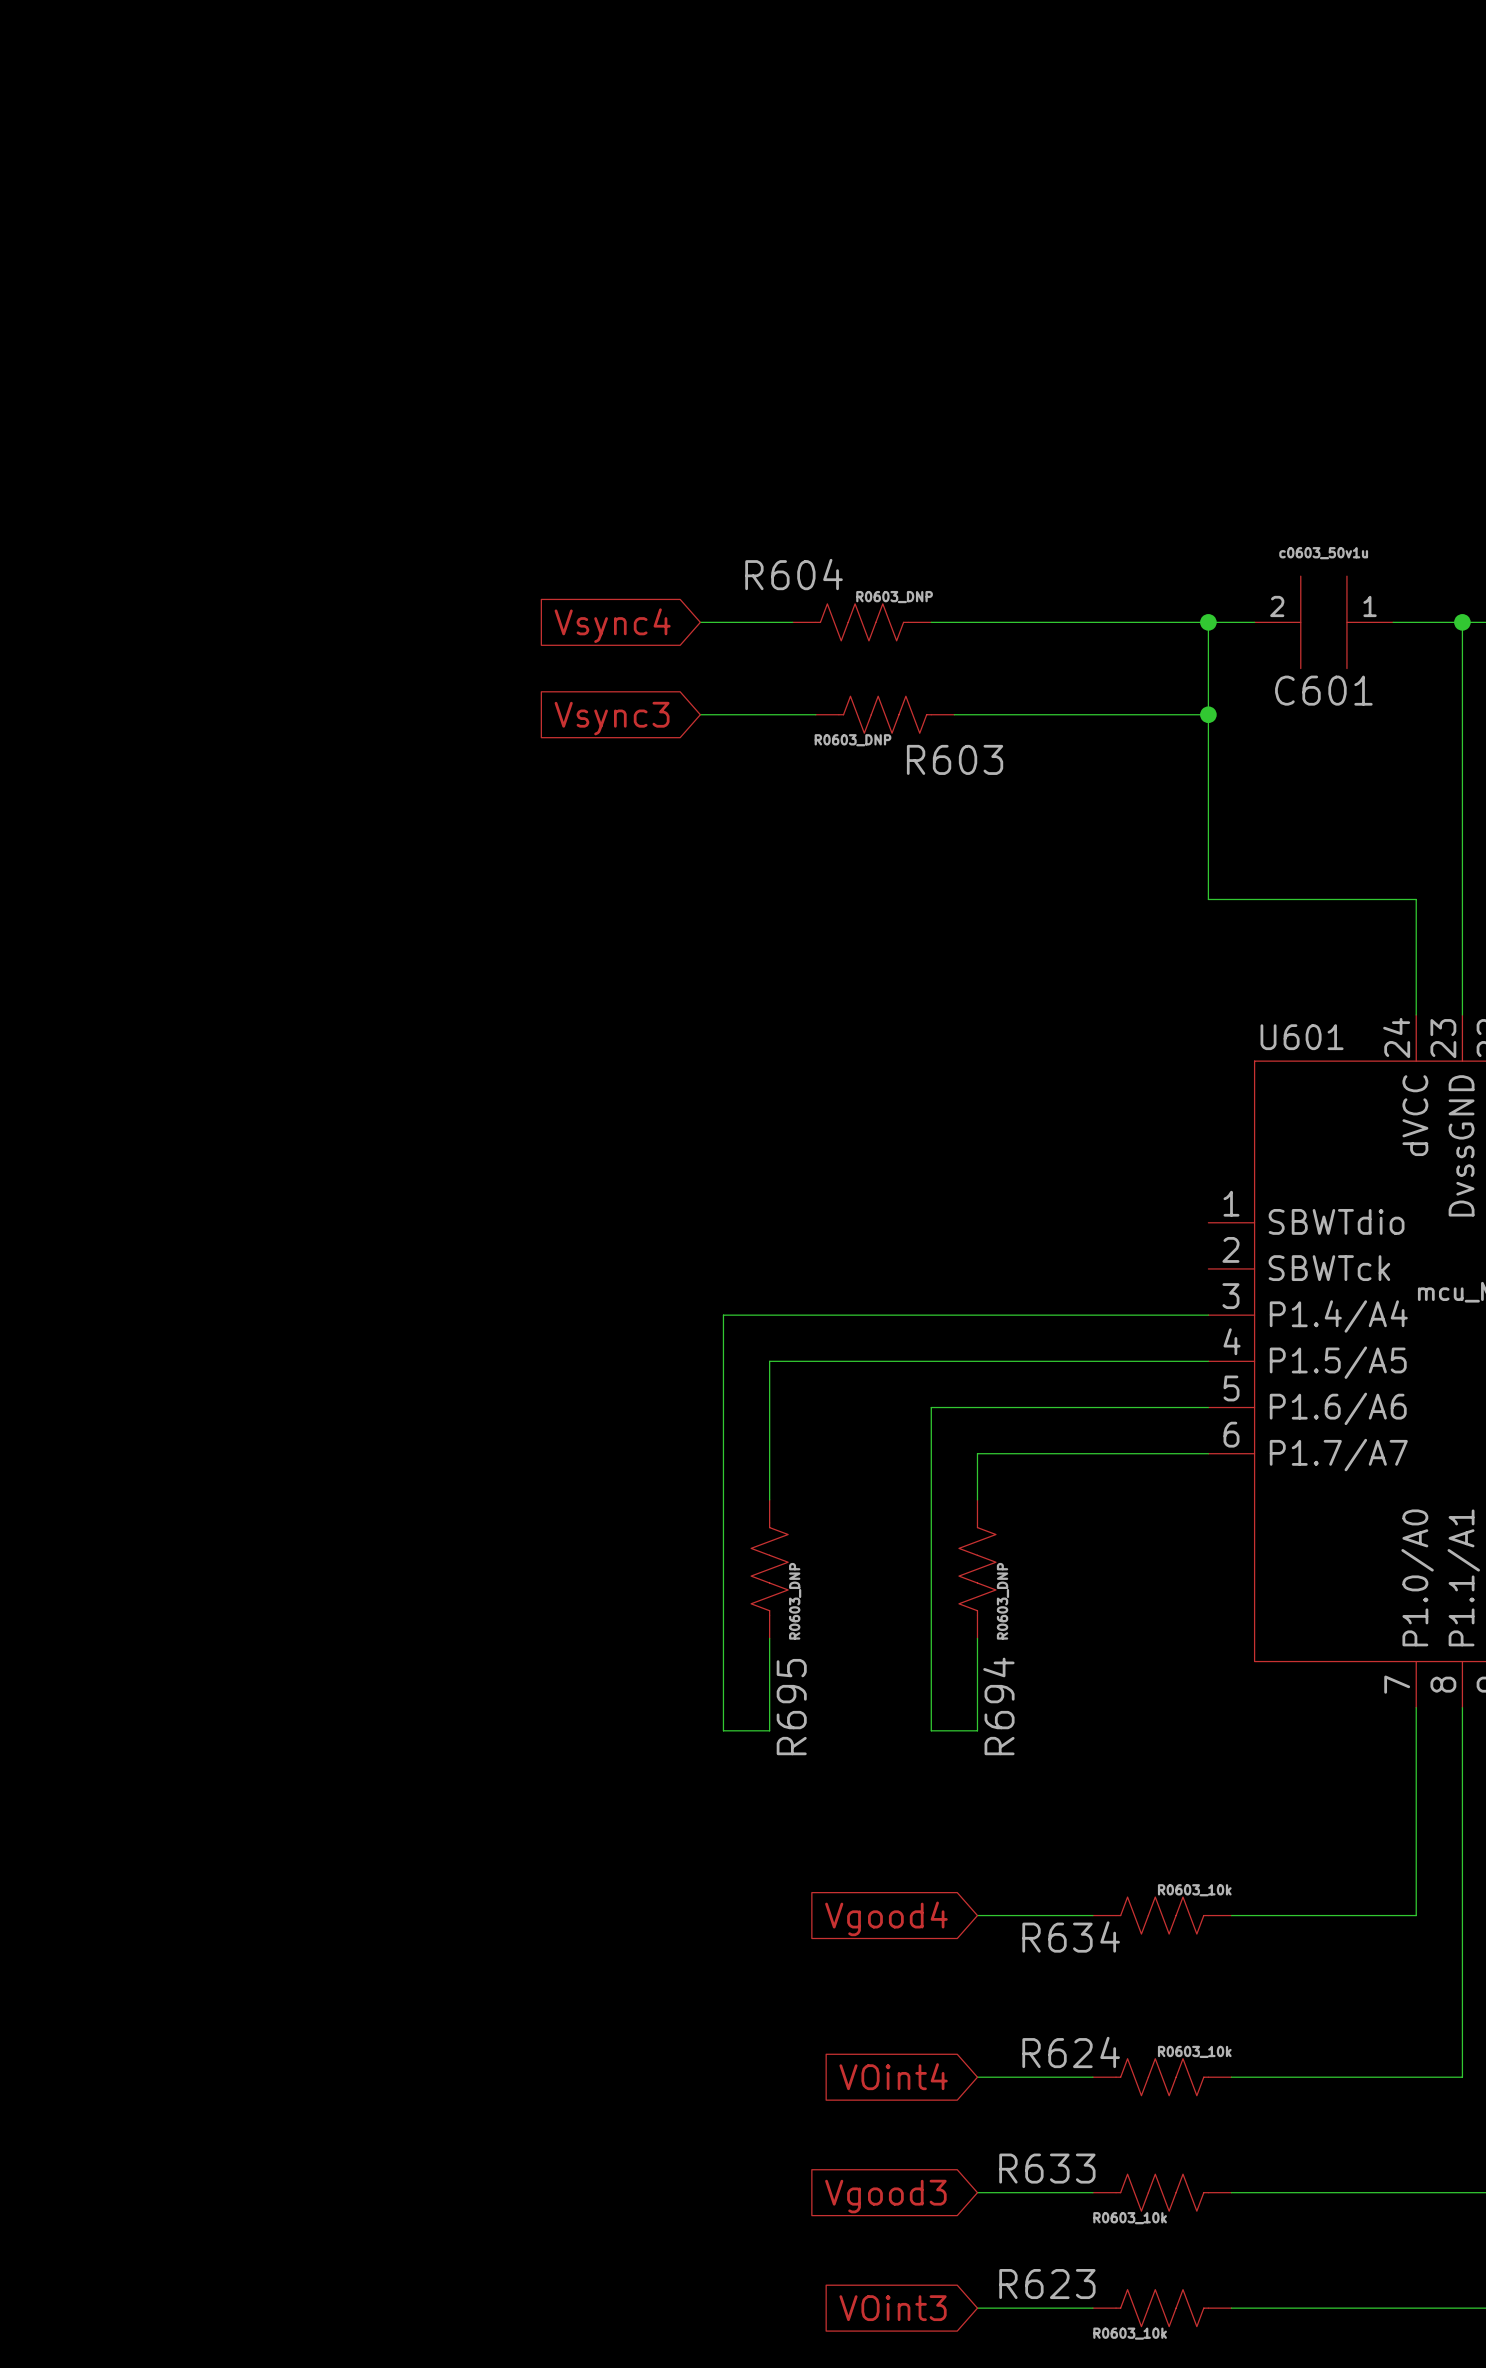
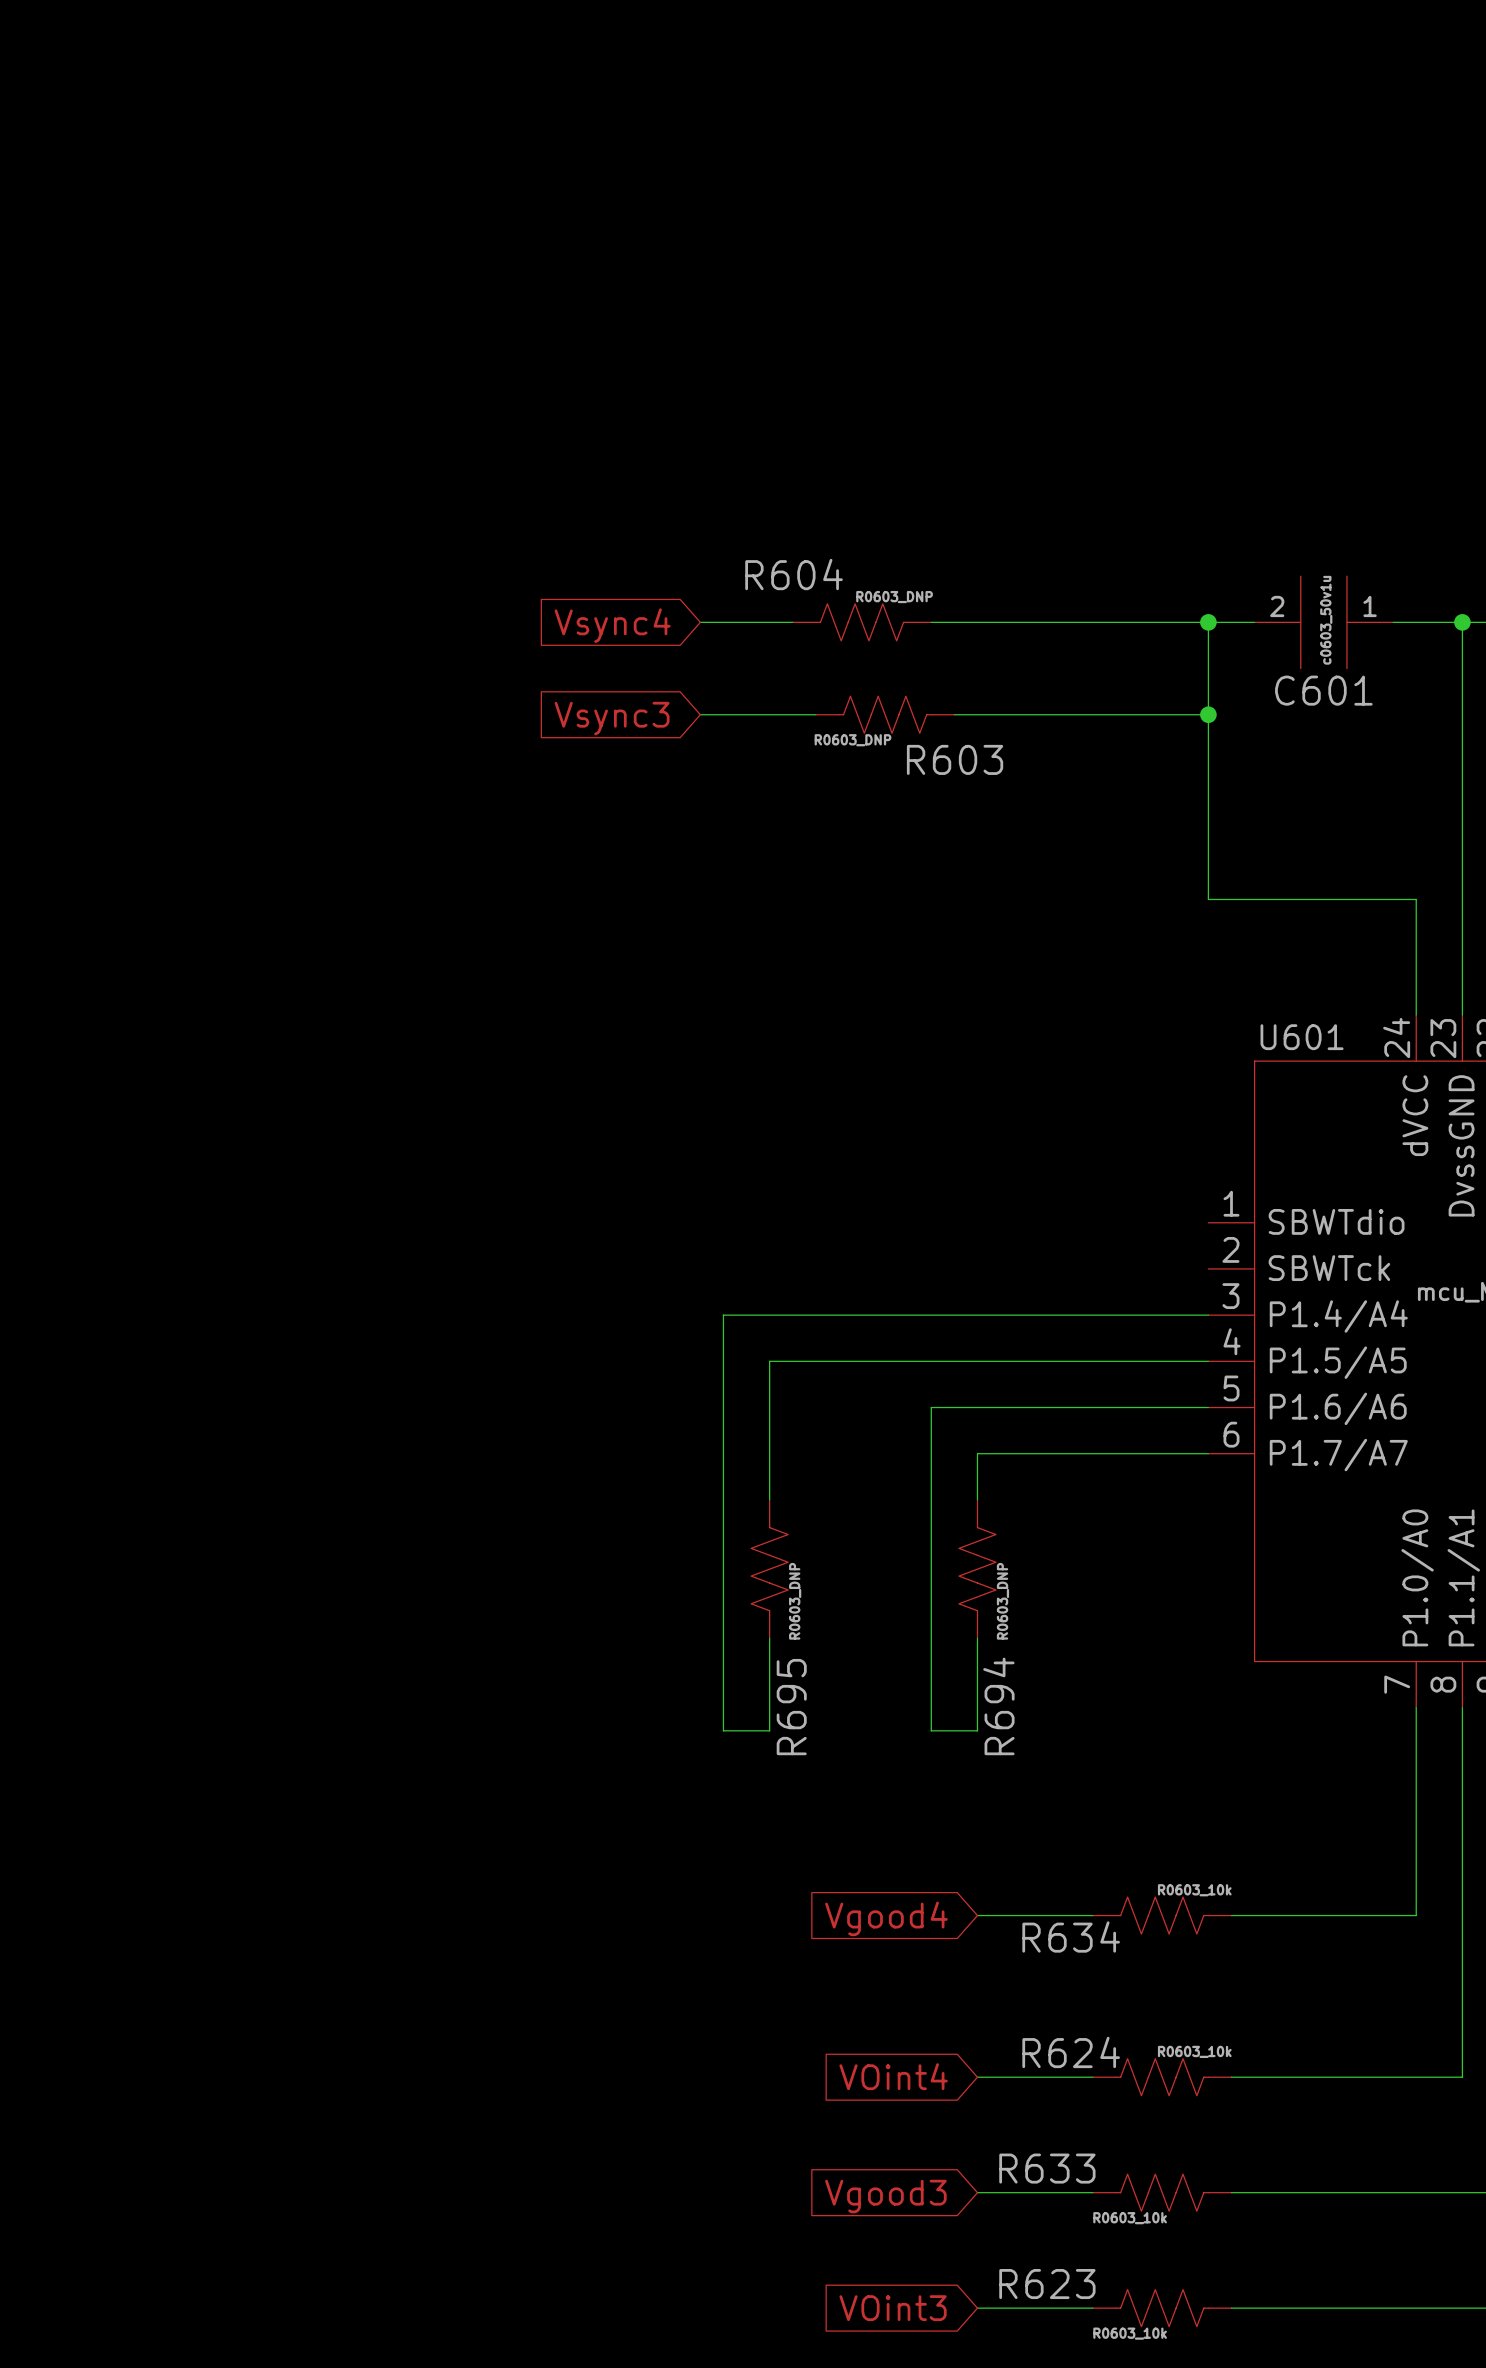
C601 value rotation: 0° (1323, 553) -> 90° counterclockwise (1326, 620)

